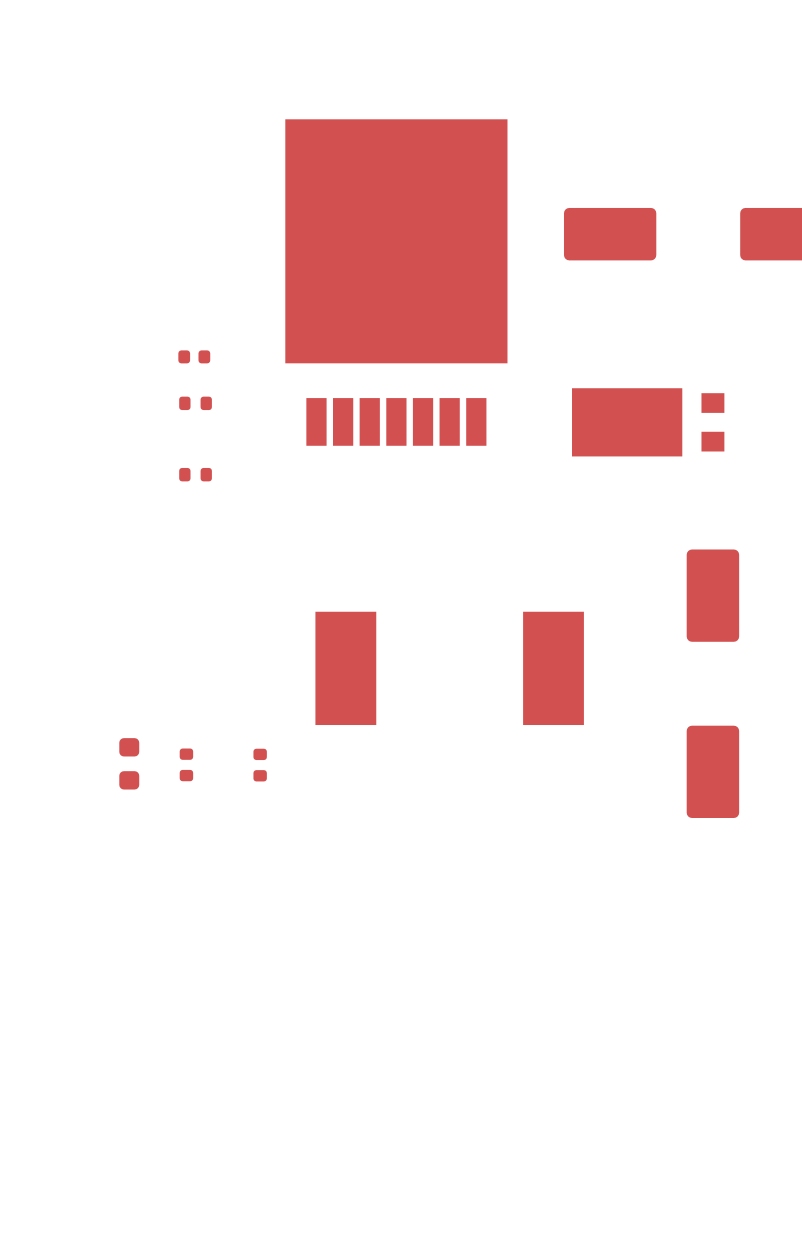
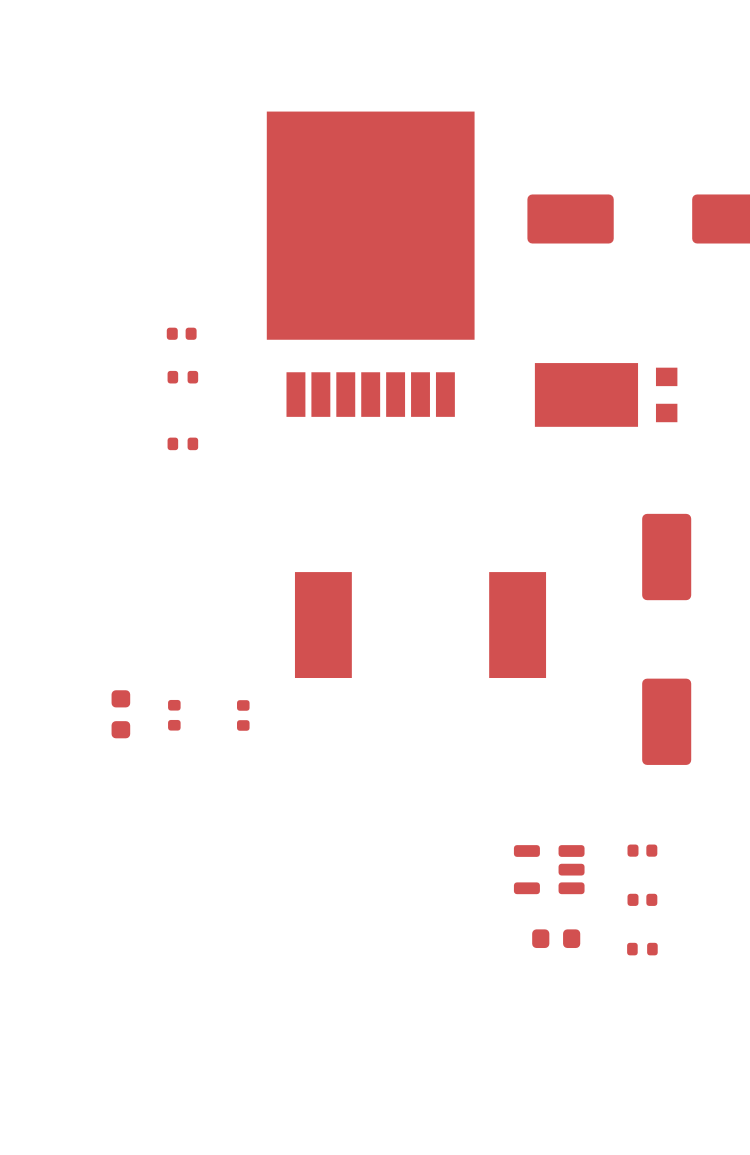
part: none -> (642, 850)
part: none -> (549, 869)
part: none -> (642, 899)
part: none -> (556, 938)
part: none -> (642, 949)

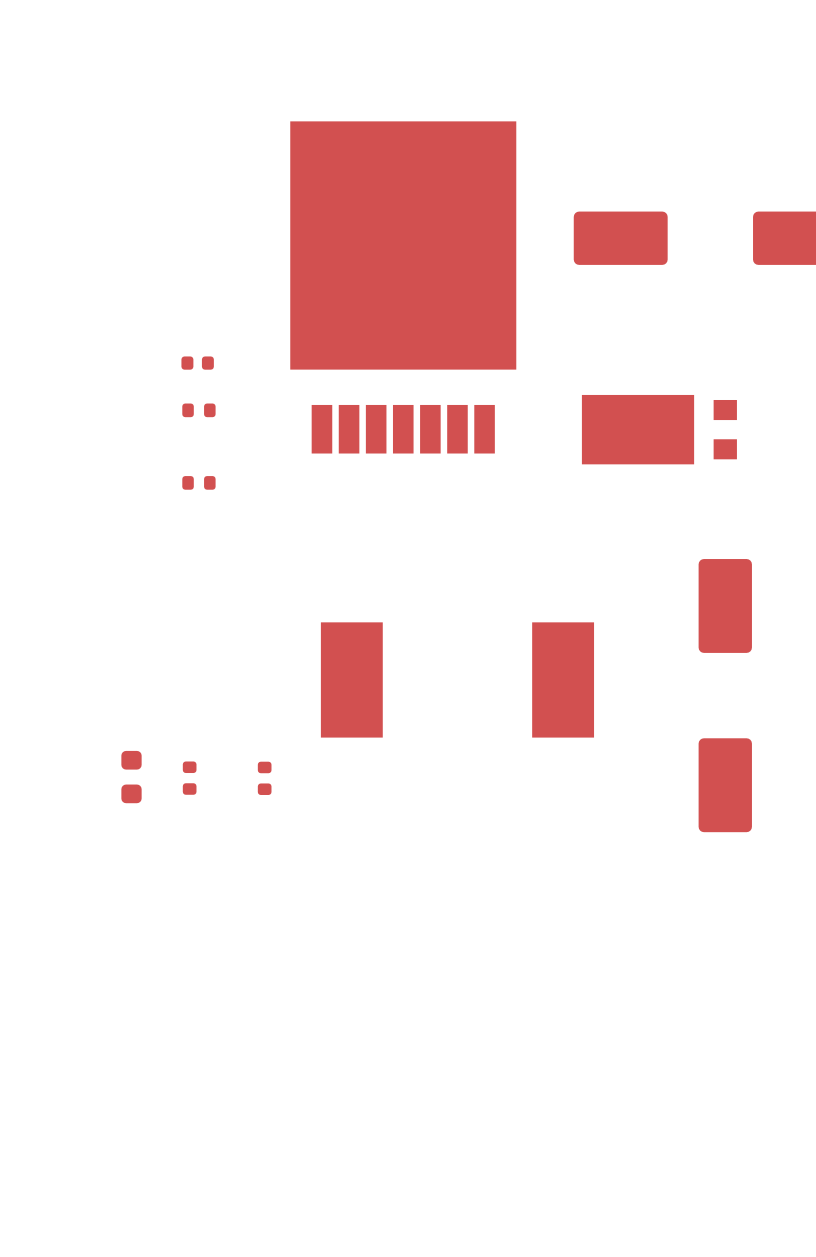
part: (642, 850) -> none
part: (549, 869) -> none
part: (642, 899) -> none
part: (556, 938) -> none
part: (642, 949) -> none

